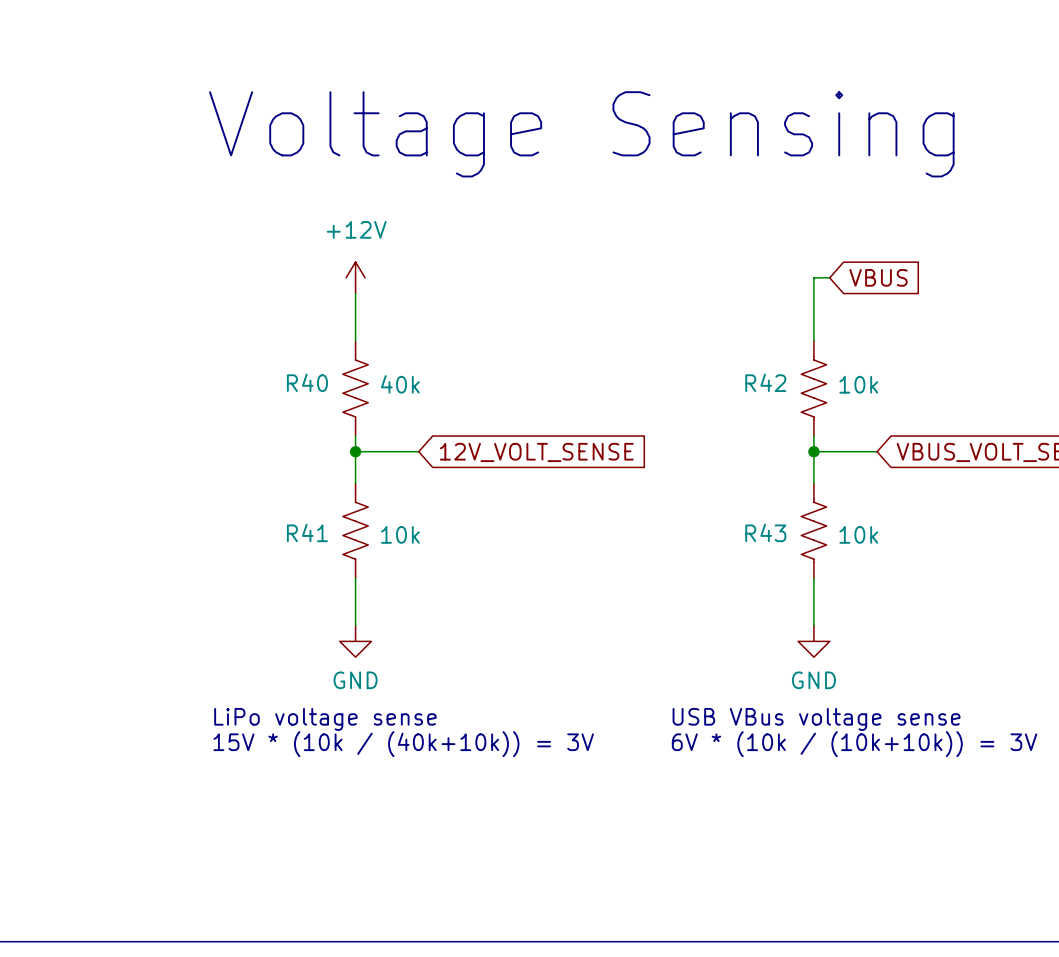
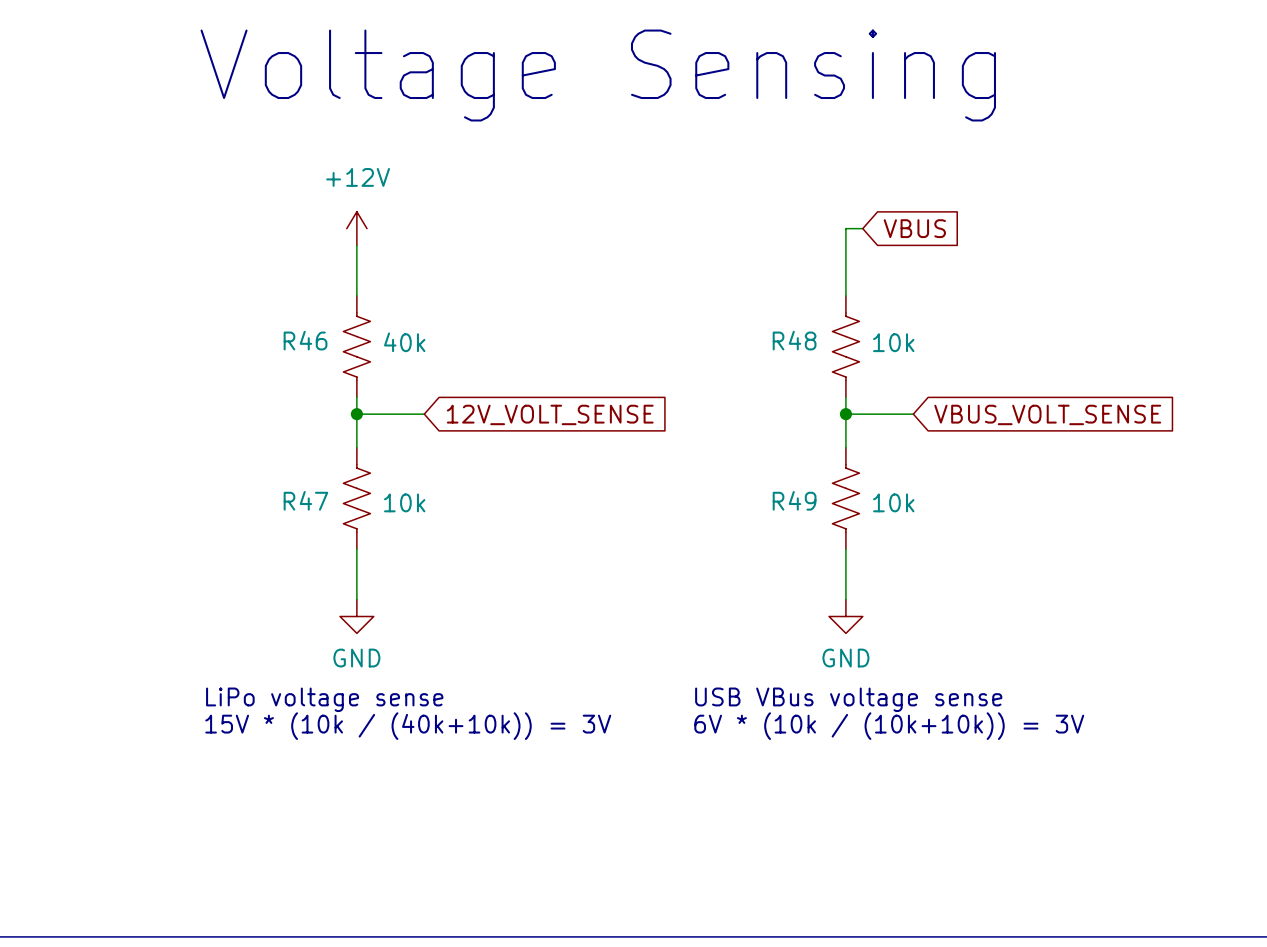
R40 name: R40 (307, 382) -> R46 (305, 340)
R42 name: R42 (765, 382) -> R48 (794, 340)
R41 name: R41 (307, 532) -> R47 (305, 500)
R43 name: R43 (765, 532) -> R49 (794, 500)

